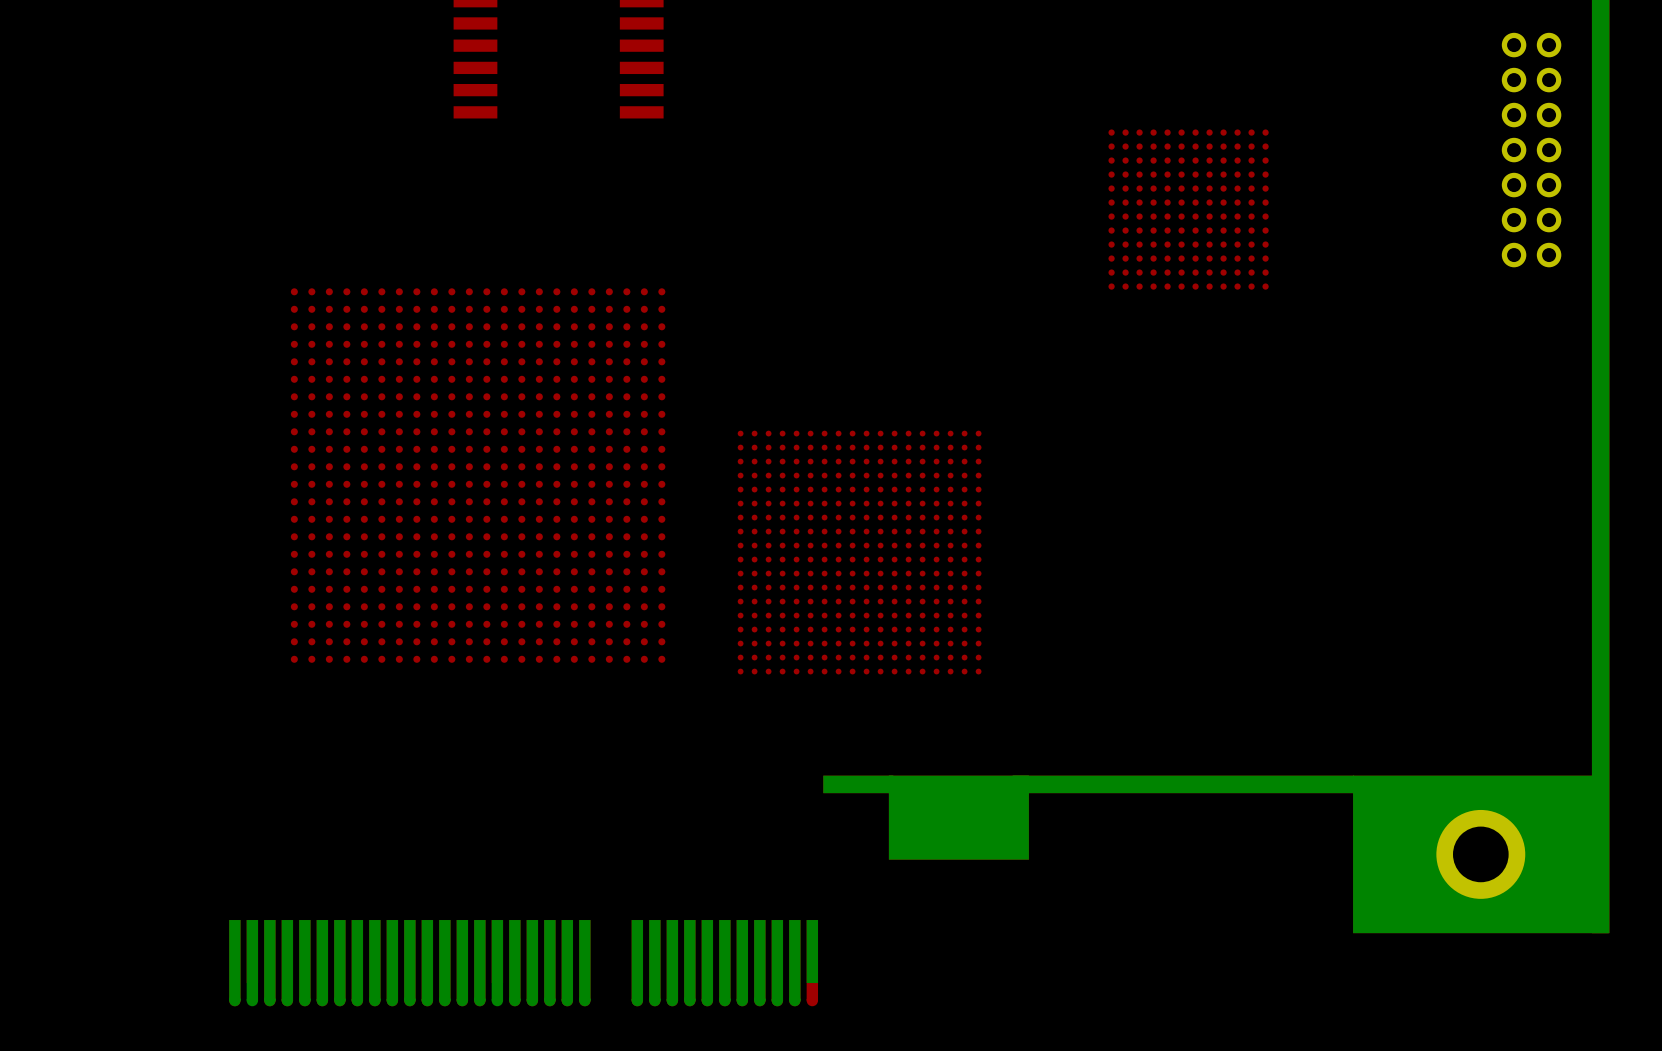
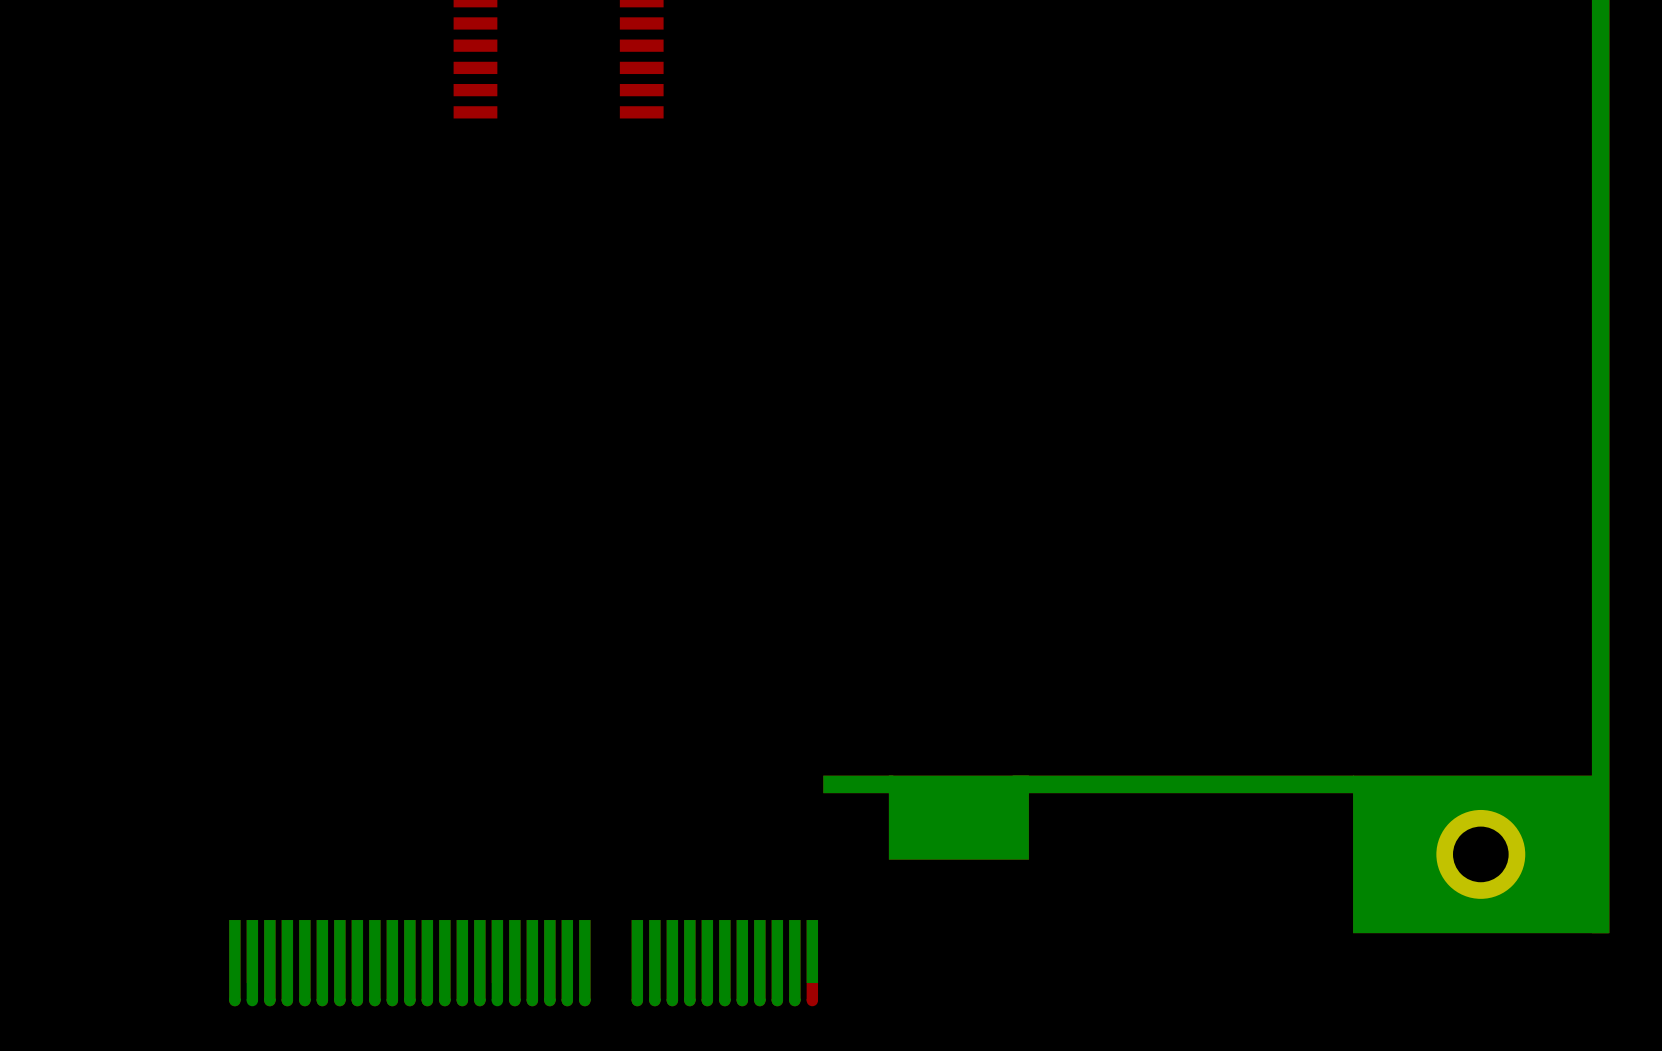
part: (1531, 150) -> none
part: (1188, 209) -> none
part: (478, 475) -> none
part: (859, 552) -> none

